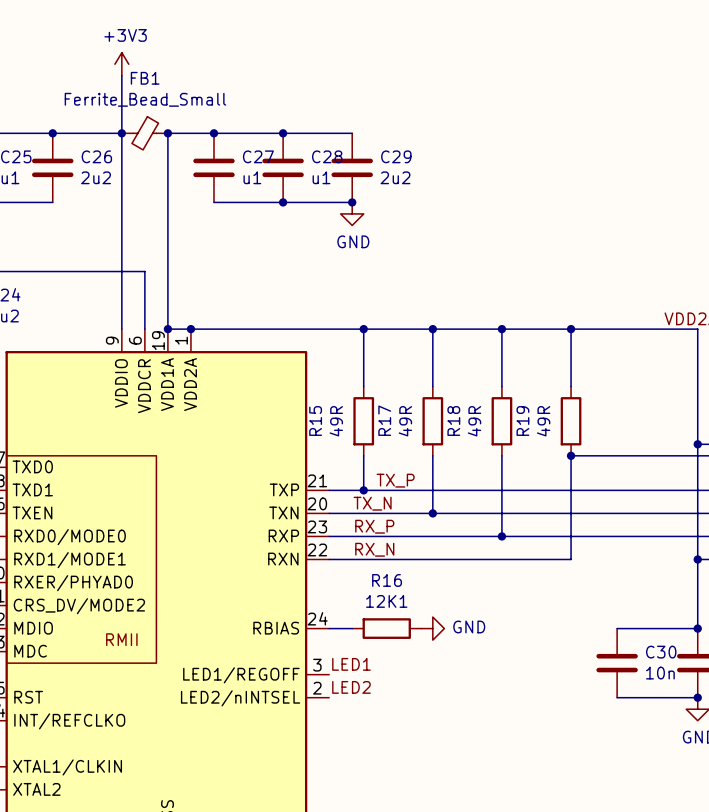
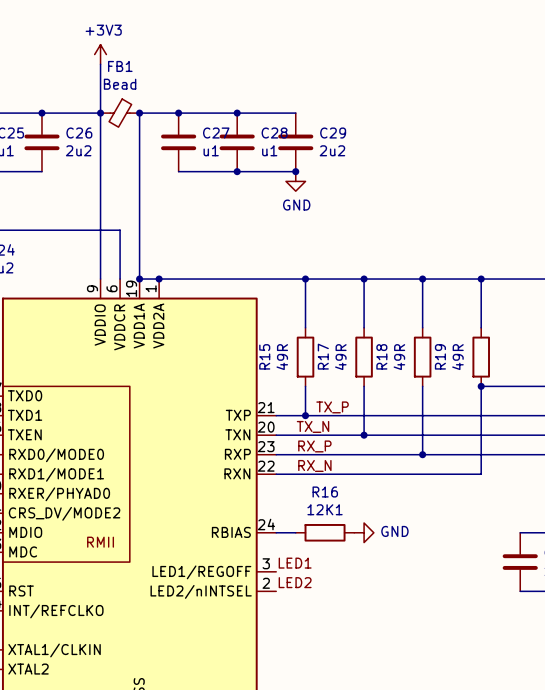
FB1 value: Ferrite_Bead_Small (145, 99) -> Bead (120, 84)

